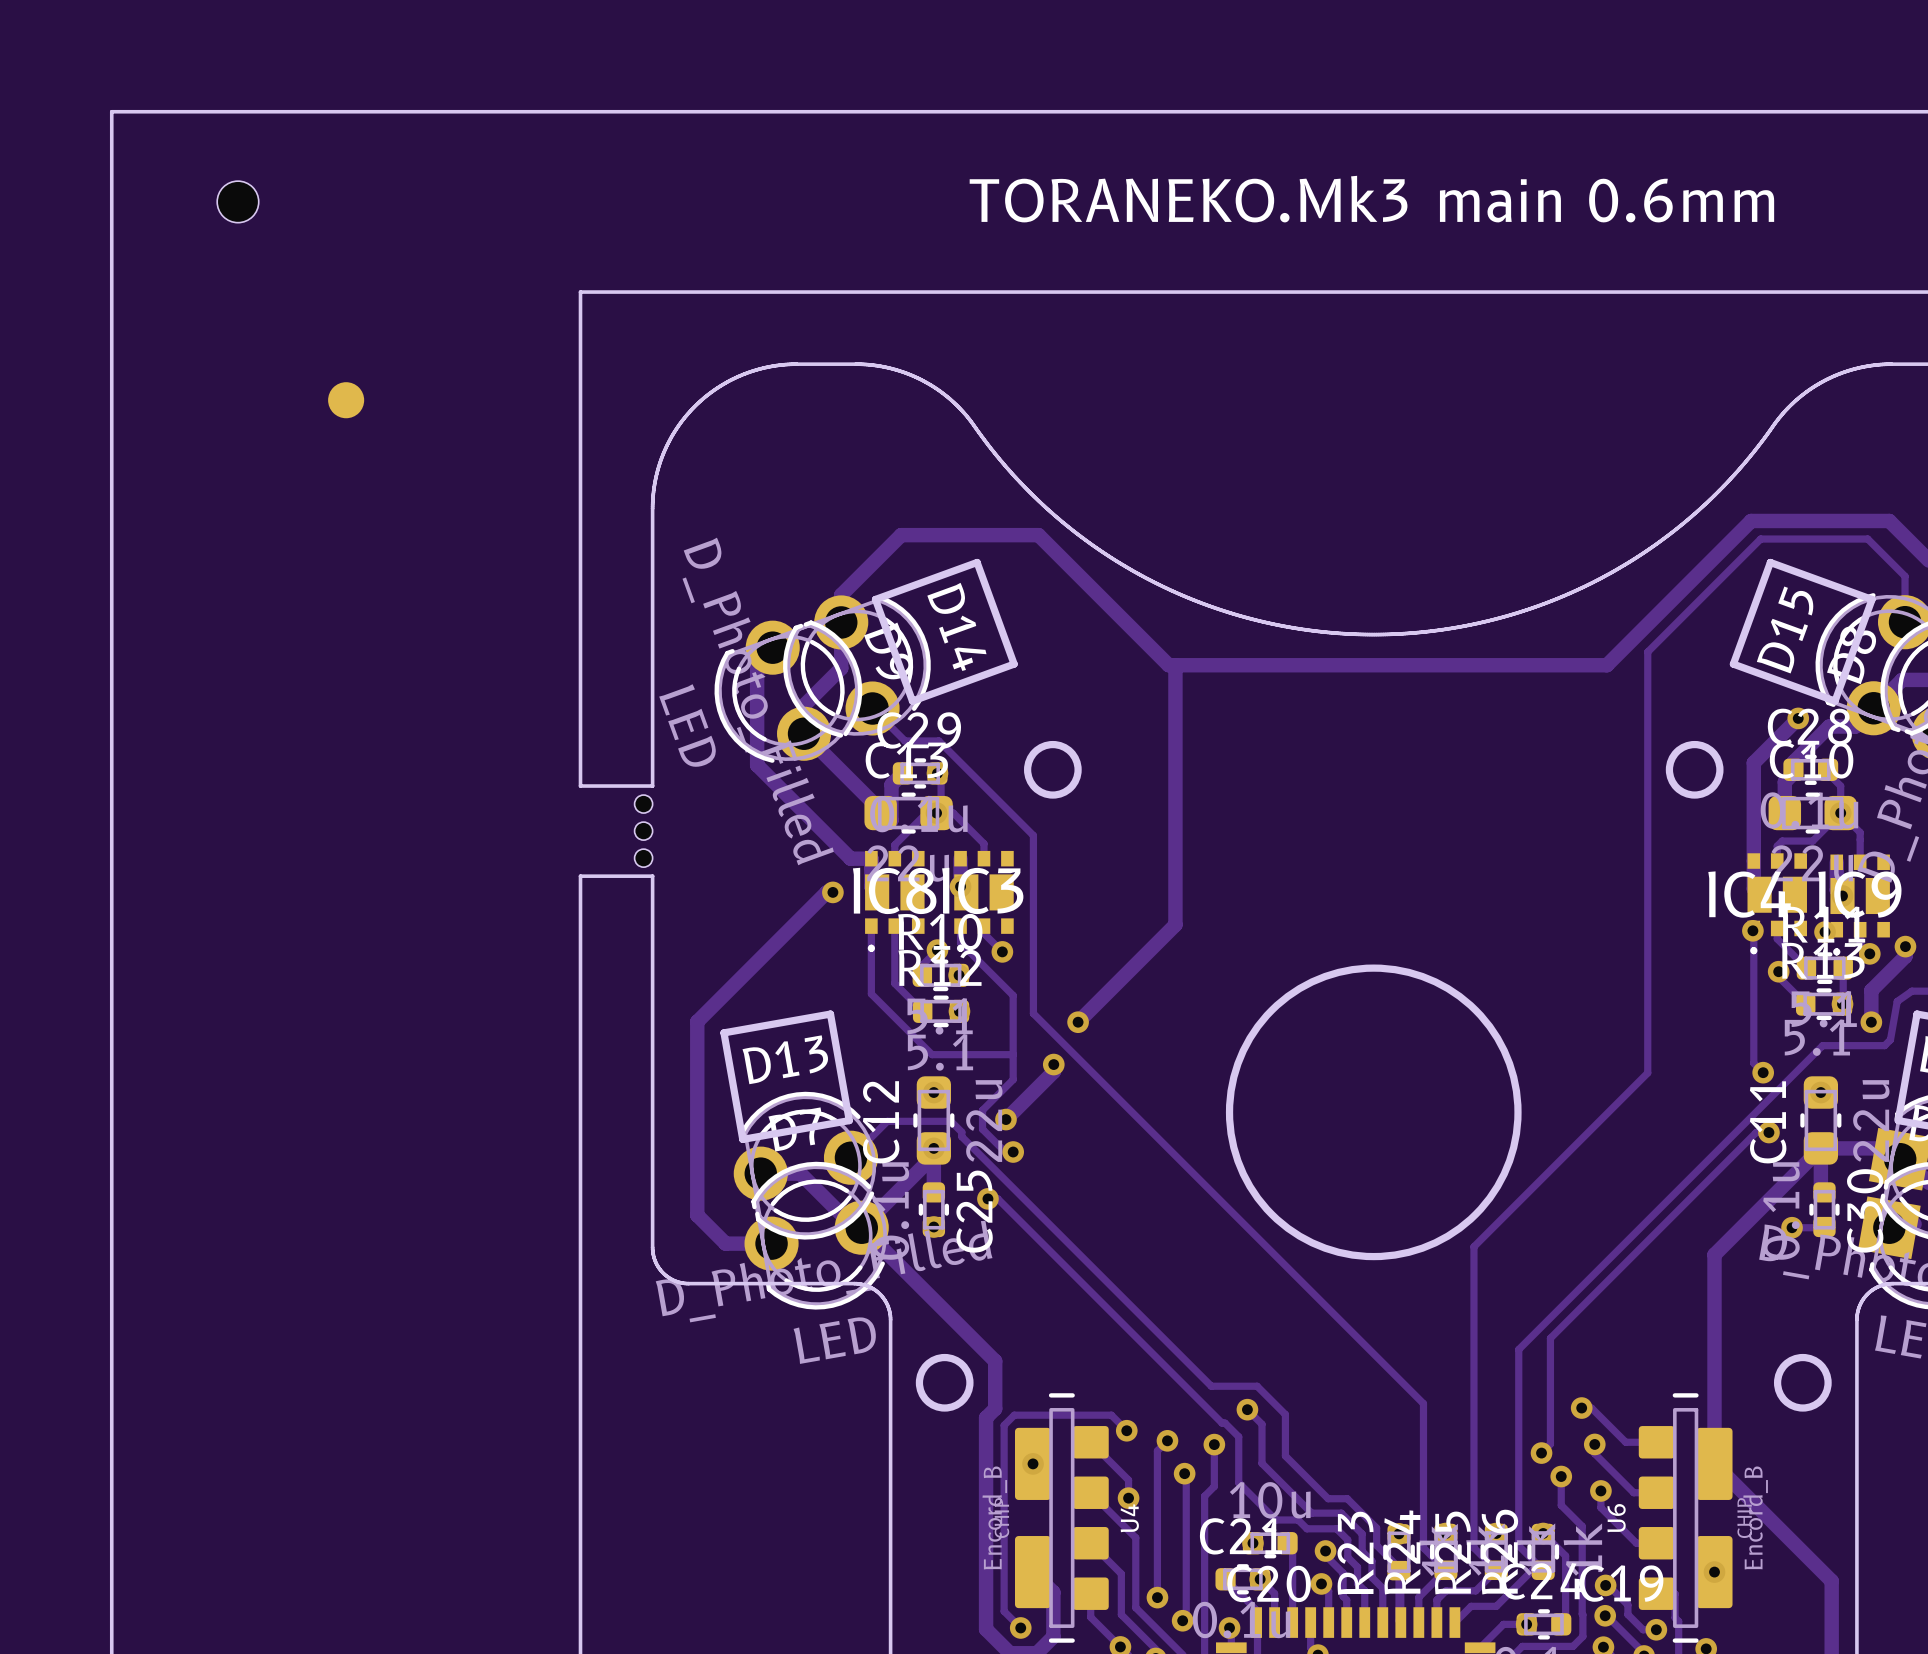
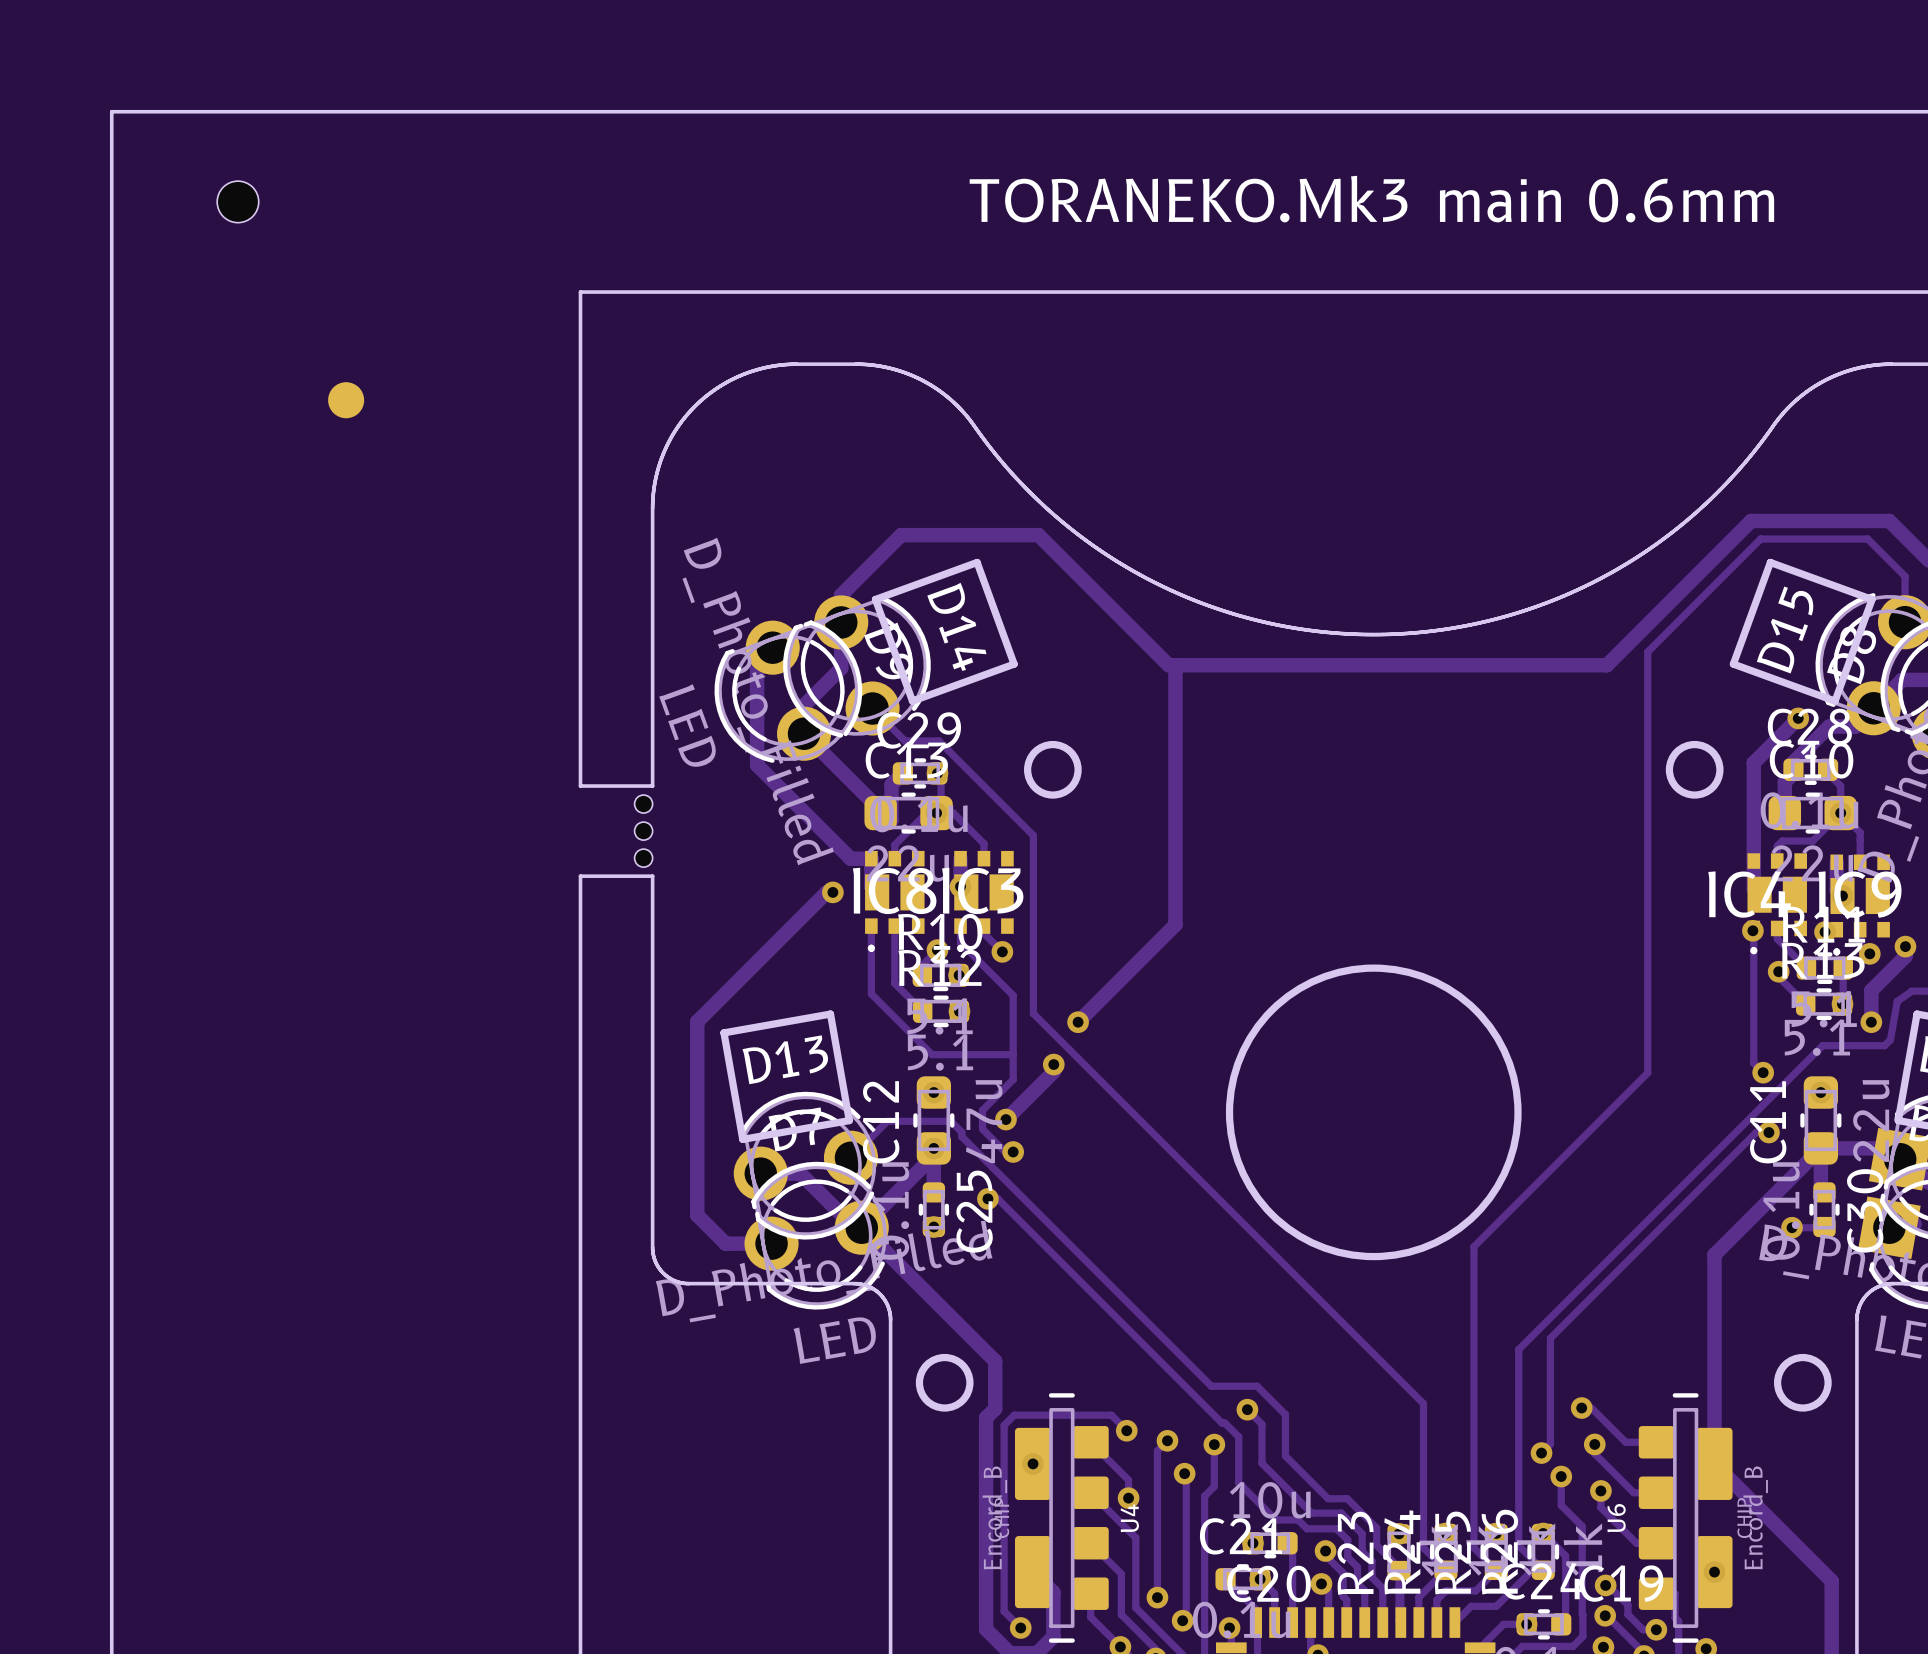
C12 value: 22u (984, 1121) -> 47u (984, 1121)

